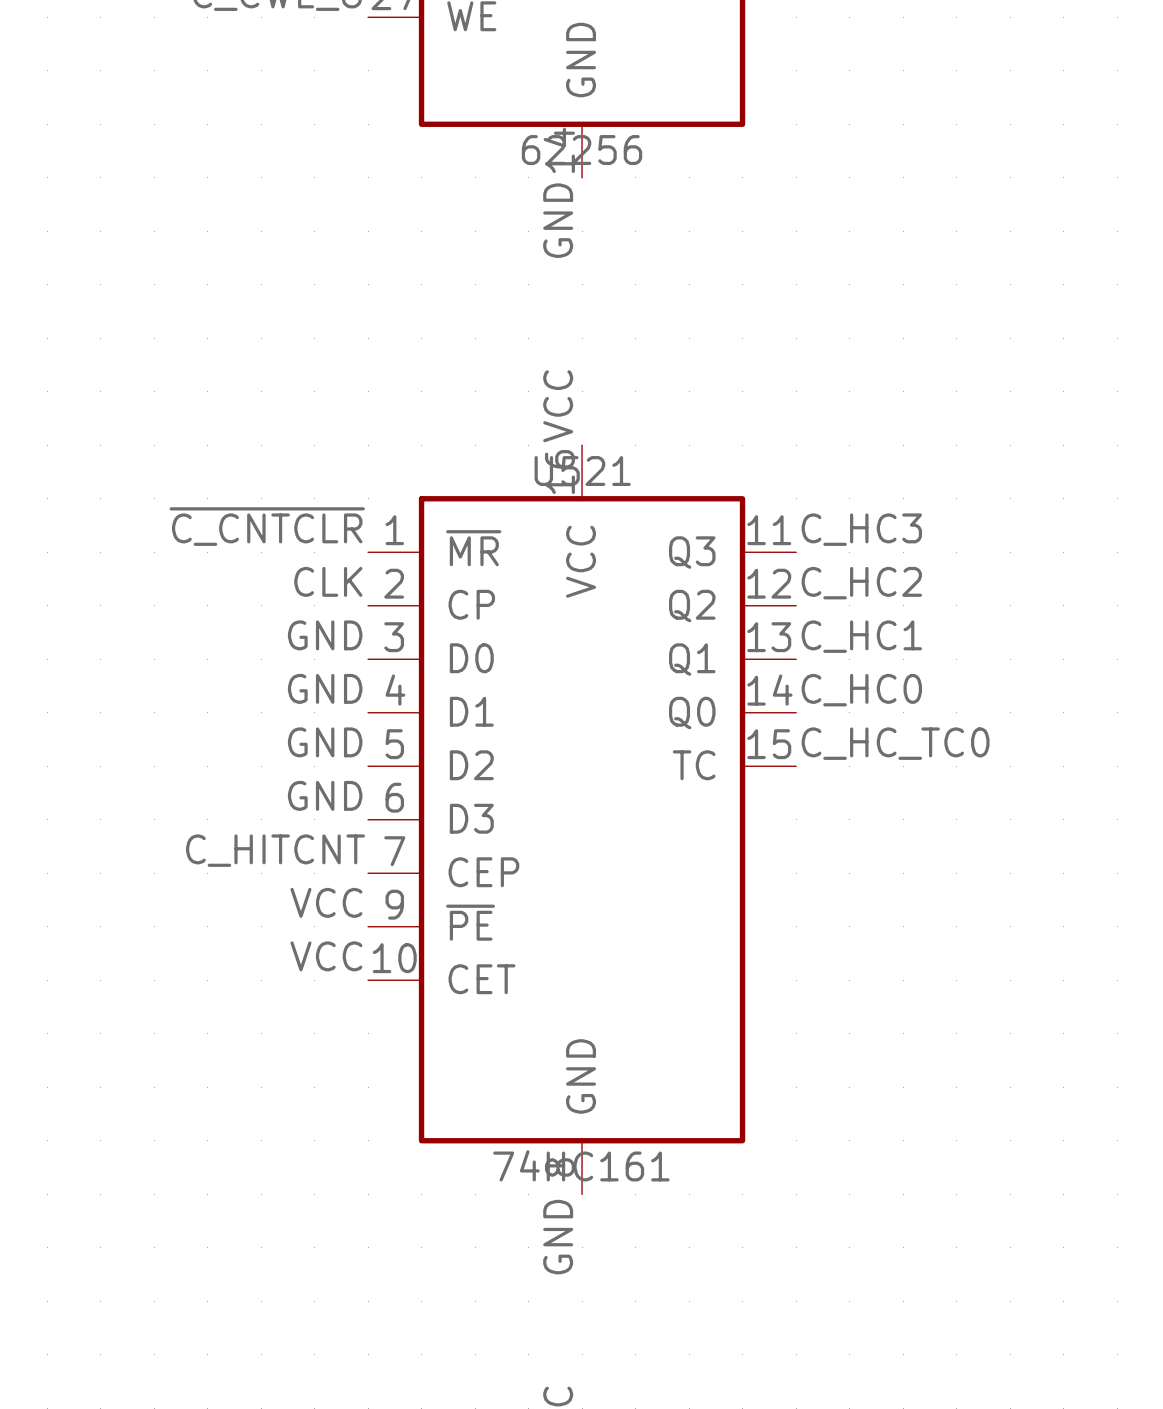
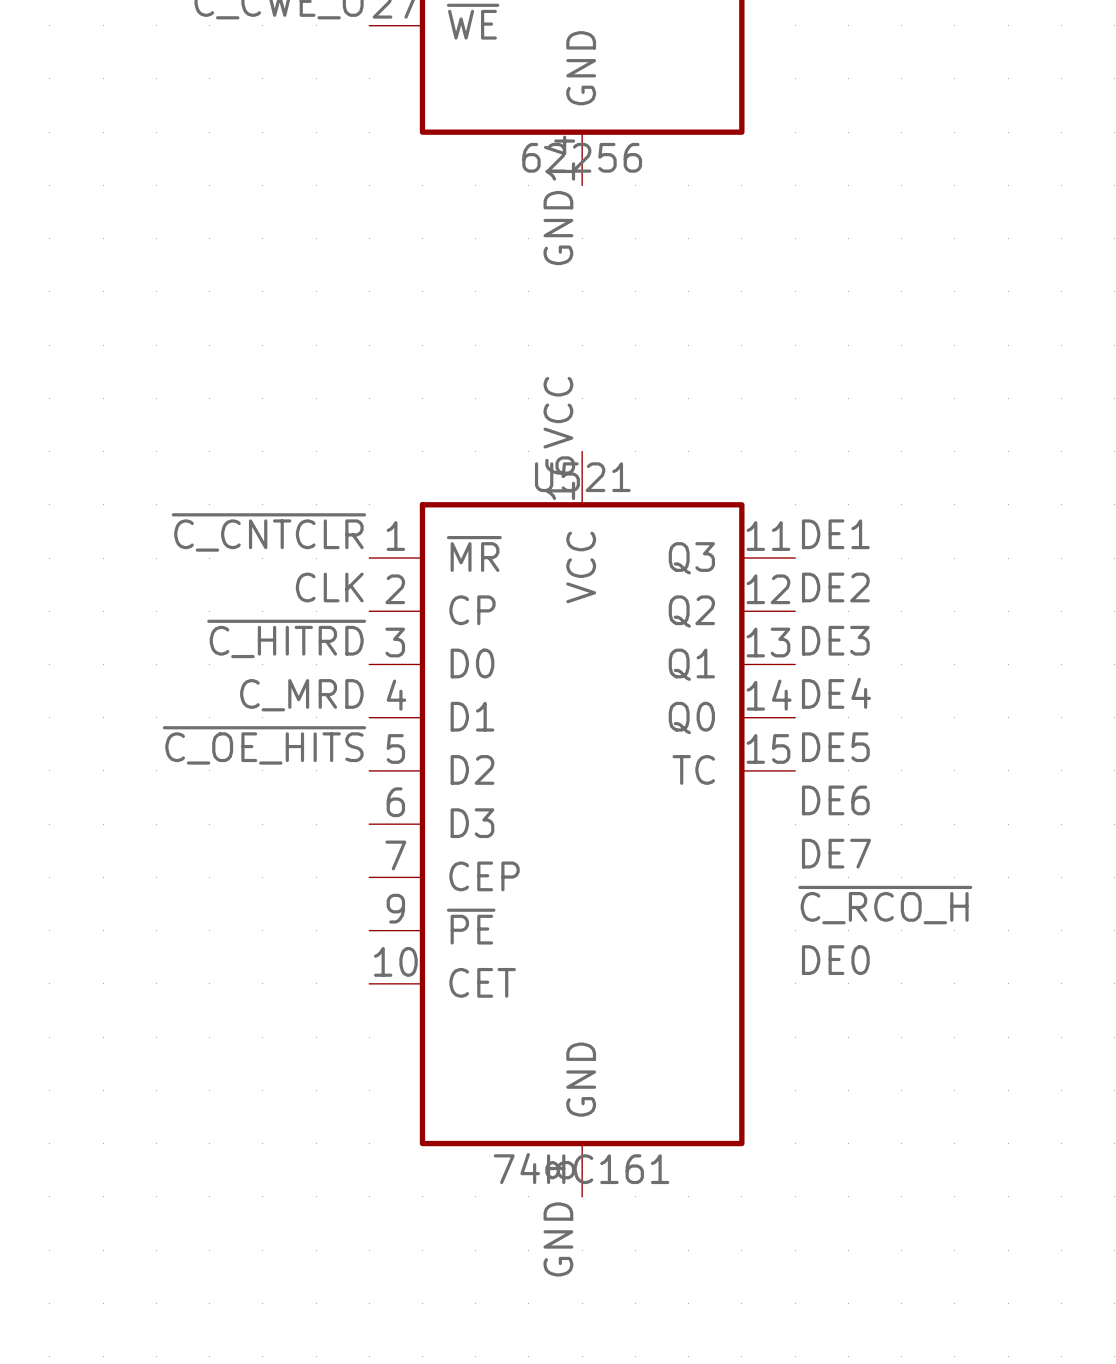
label: C_HC3 (861, 529) -> DE1 (835, 534)
label: C_HC2 (861, 583) -> DE2 (835, 587)
label: GND (325, 635) -> ~{C_HITRD} (286, 638)
label: C_HC1 (861, 636) -> DE3 (835, 640)
label: GND (325, 688) -> C_MRD (301, 695)
label: C_HC0 (861, 690) -> DE4 (836, 693)
label: GND (325, 742) -> ~{C_OE_HITS} (264, 745)
label: C_HC_TC0 (895, 743) -> DE5 (835, 747)
label: GND (325, 795) -> none
label: none -> DE6 (835, 800)
label: none -> DE7 (836, 853)
label: C_HITCNT (275, 850) -> none
label: none -> ~{C_RCO_H} (885, 905)
label: VCC (326, 902) -> none
label: VCC (326, 956) -> none
label: none -> DE0 (835, 960)

